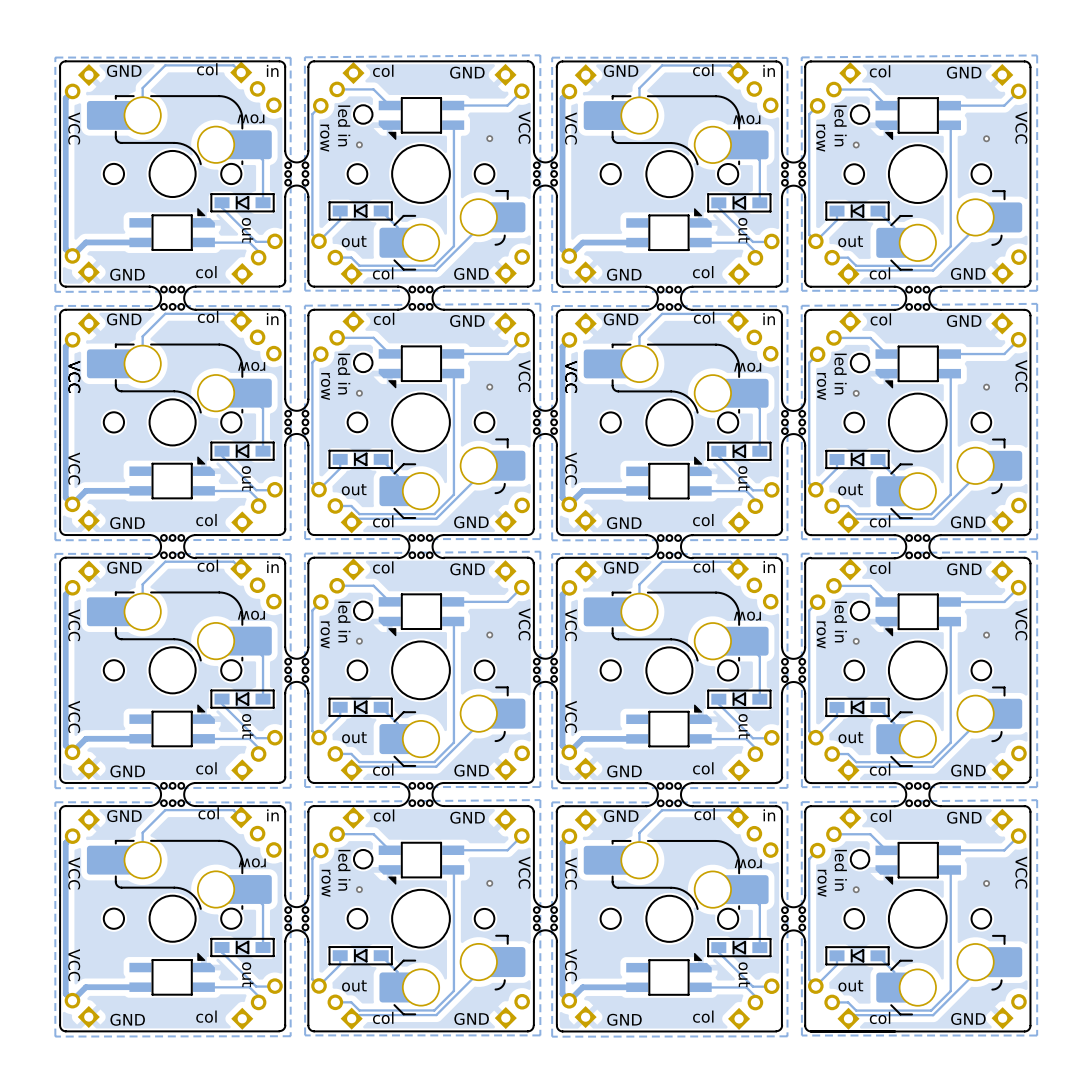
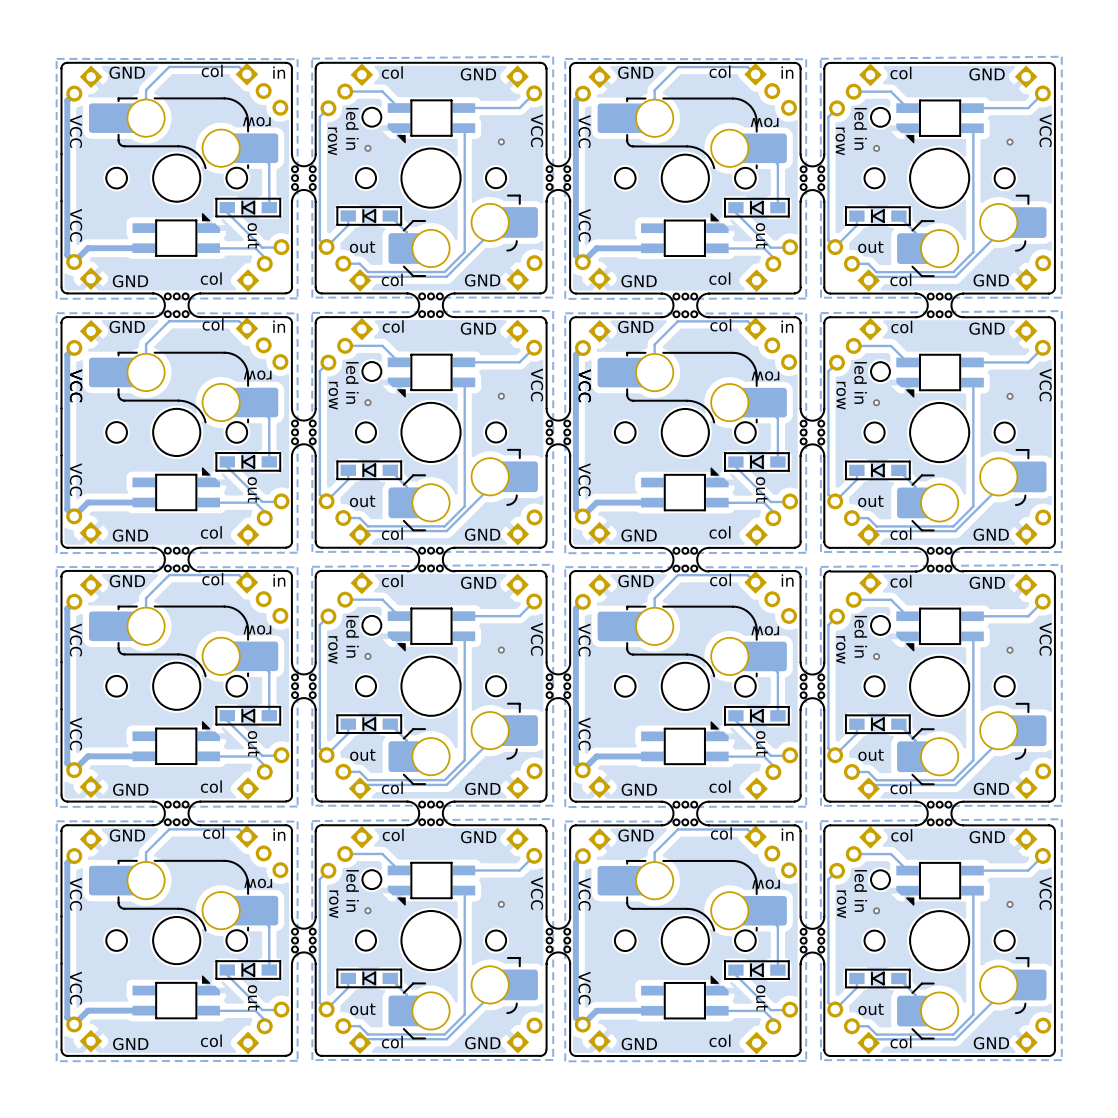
text: none -> VCC (76, 225)
text: none -> VCC (584, 225)

